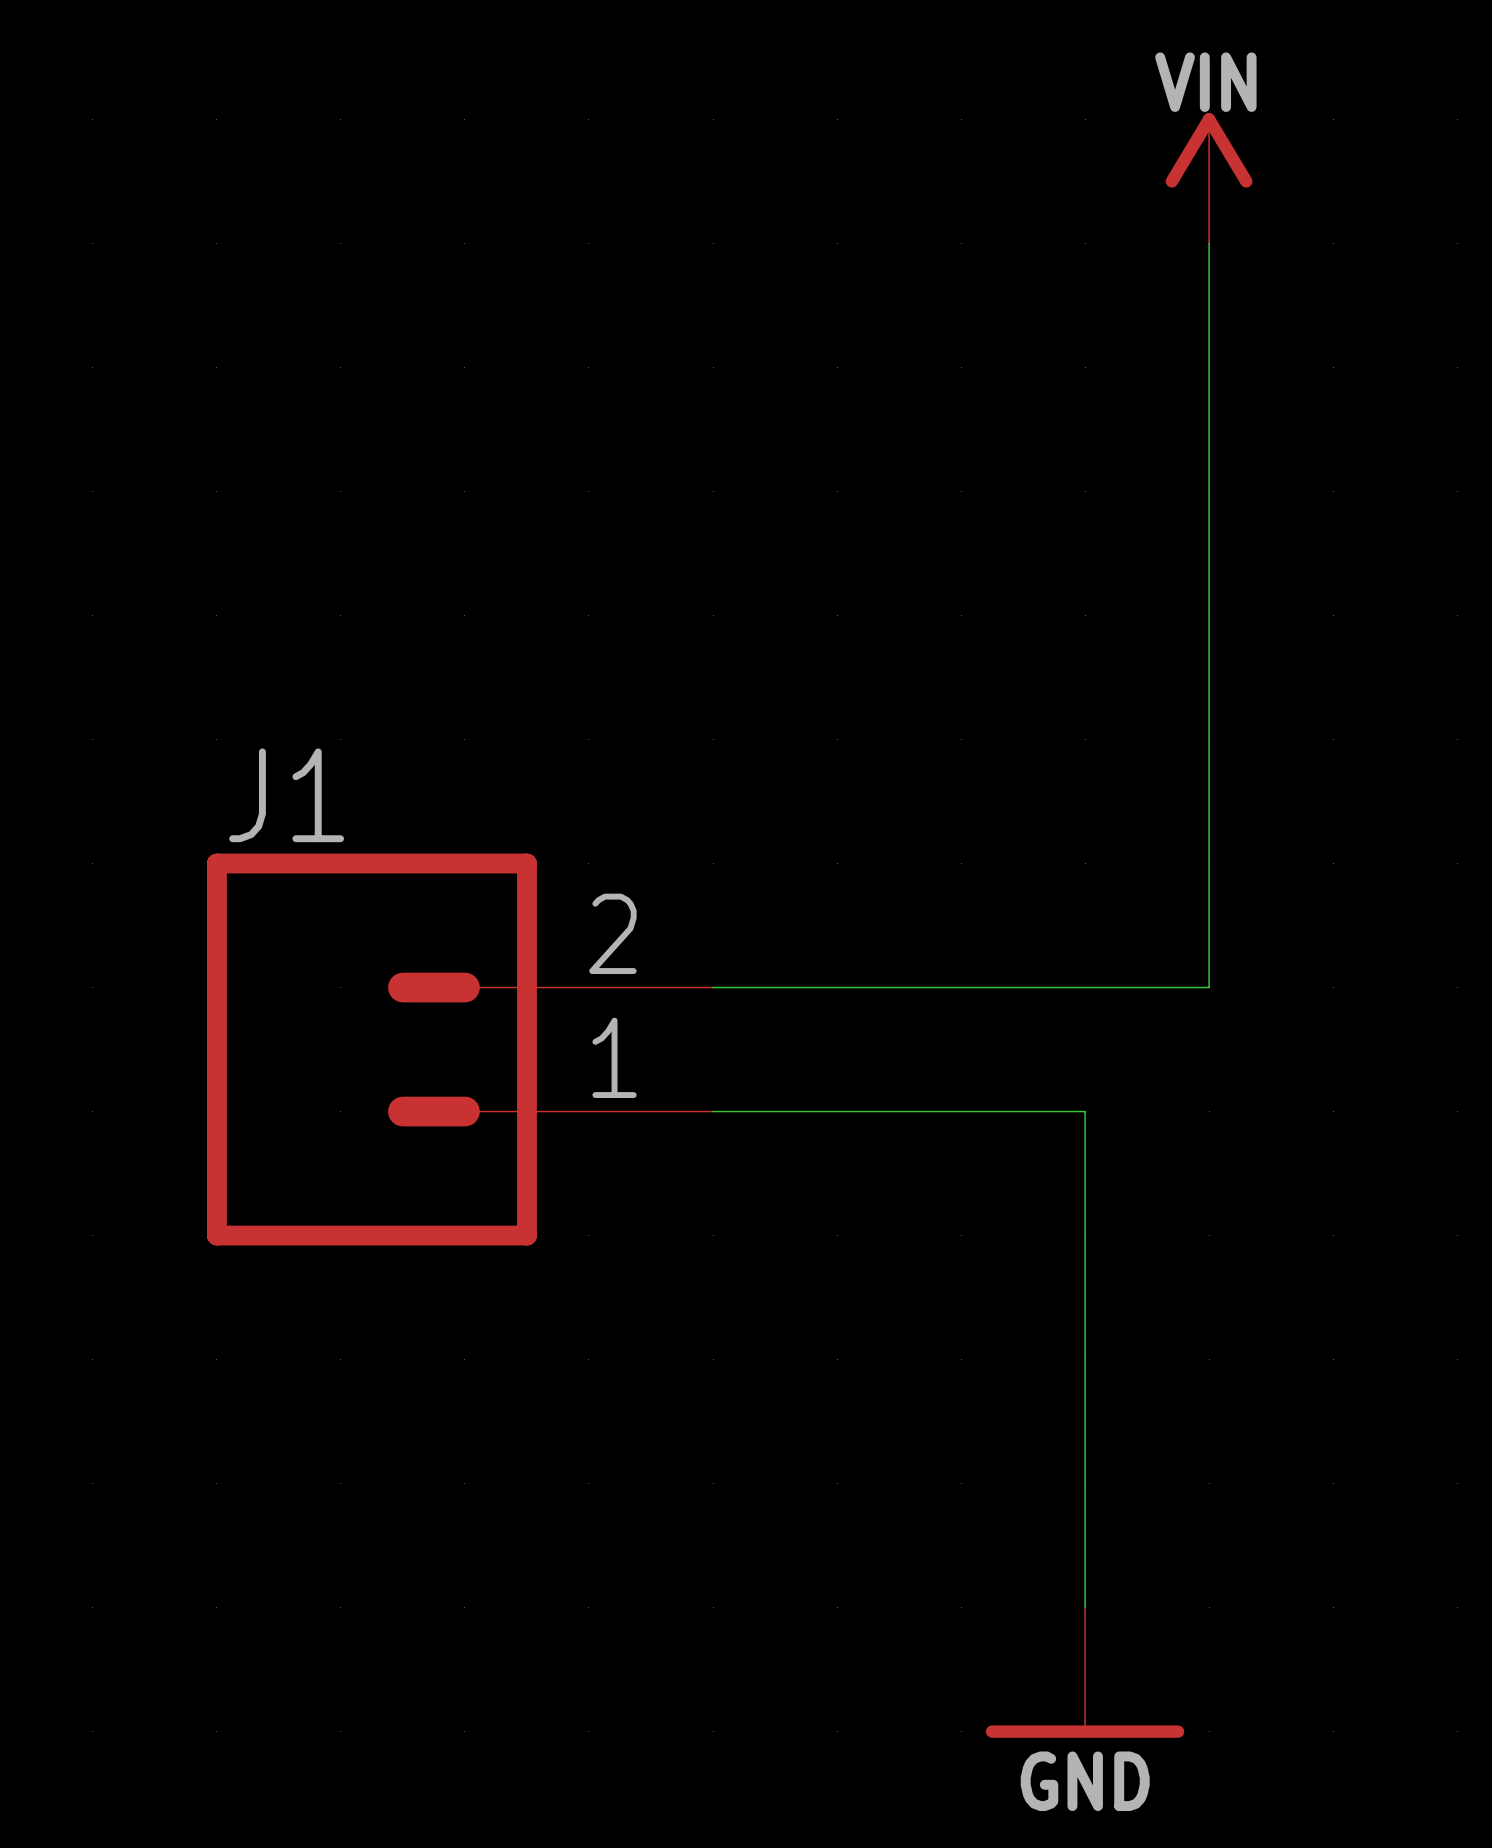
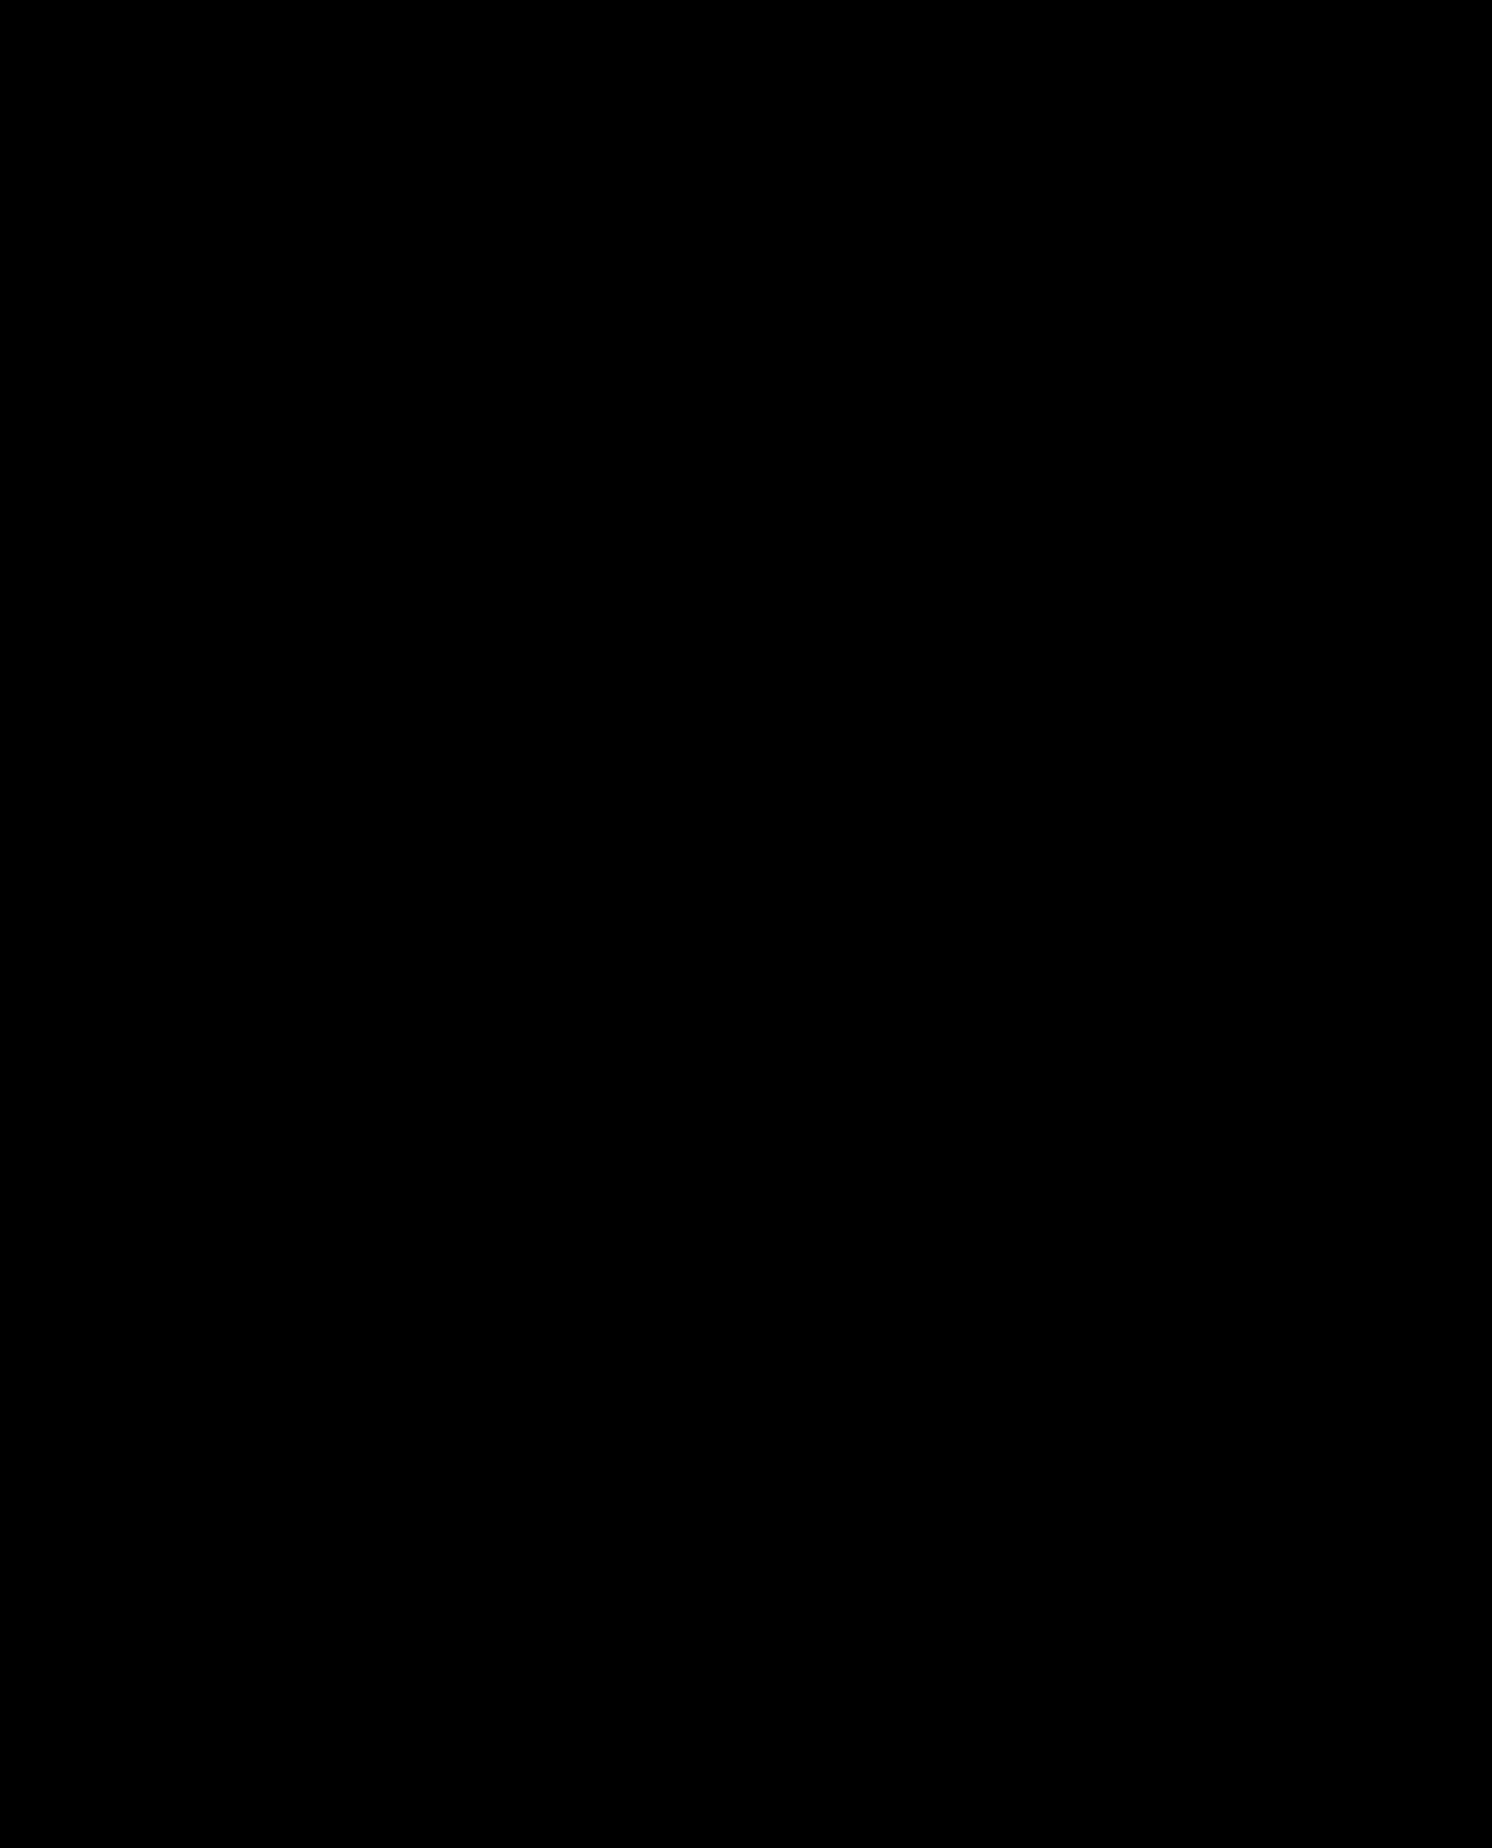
power symbol: VIN (1209, 178) -> none
wire: (1209, 243) (1209, 987) (713, 987) -> none
J1: (460, 1049) -> none
wire: (713, 1111) (1085, 1111) (1085, 1607) -> none
power symbol: GND (1085, 1672) -> none

